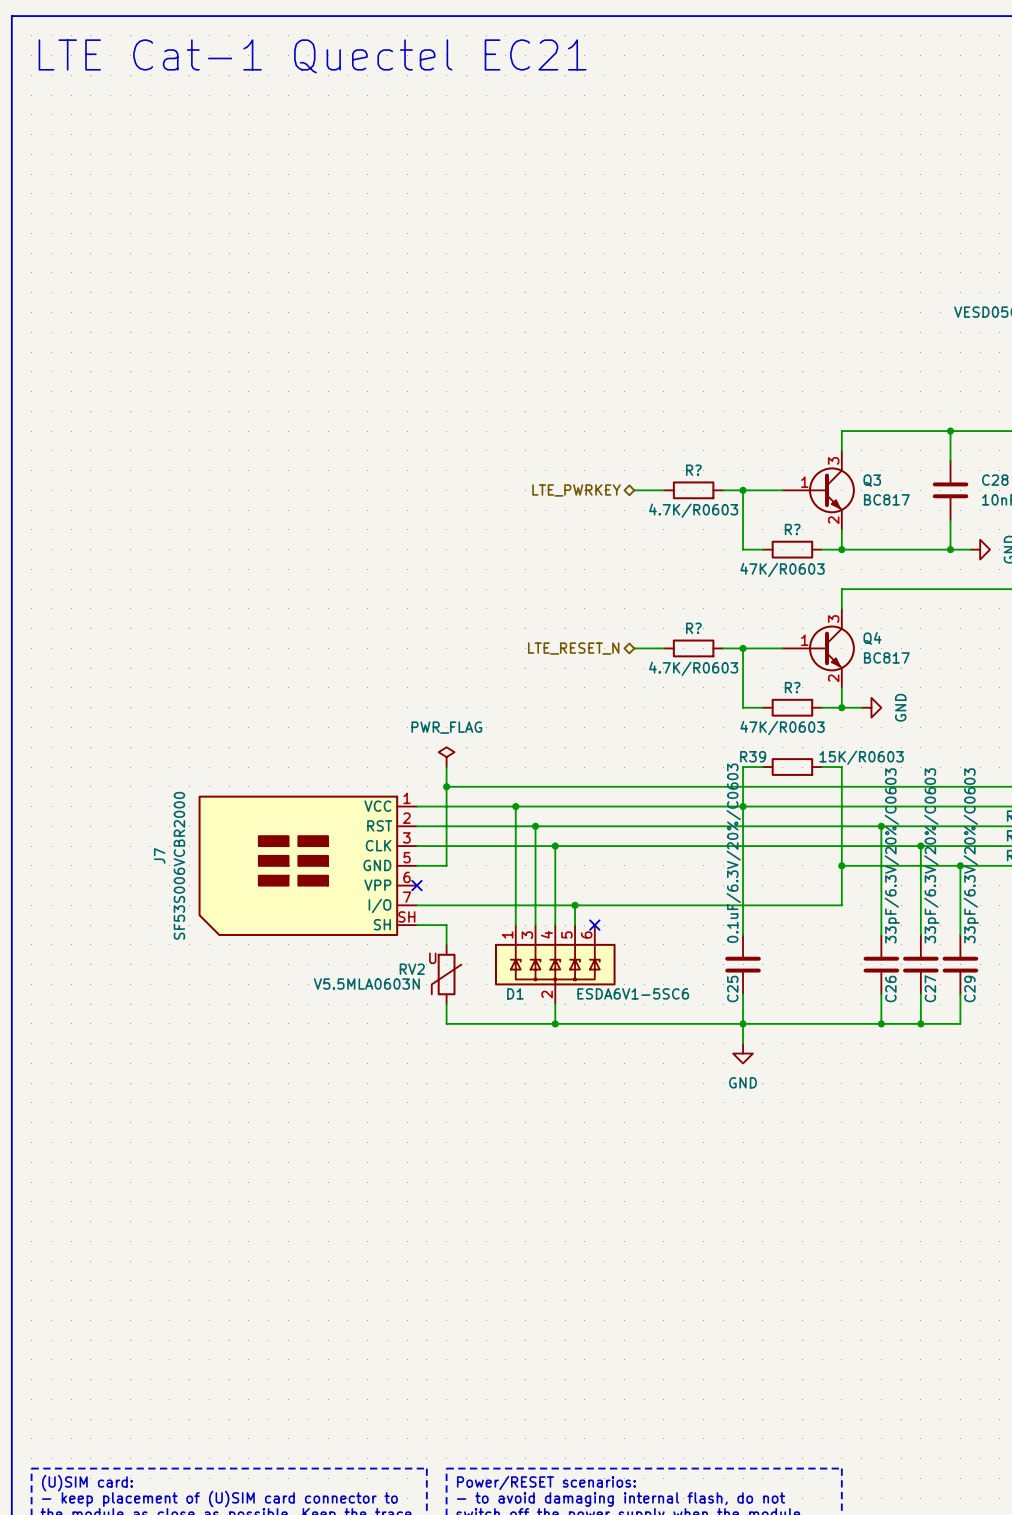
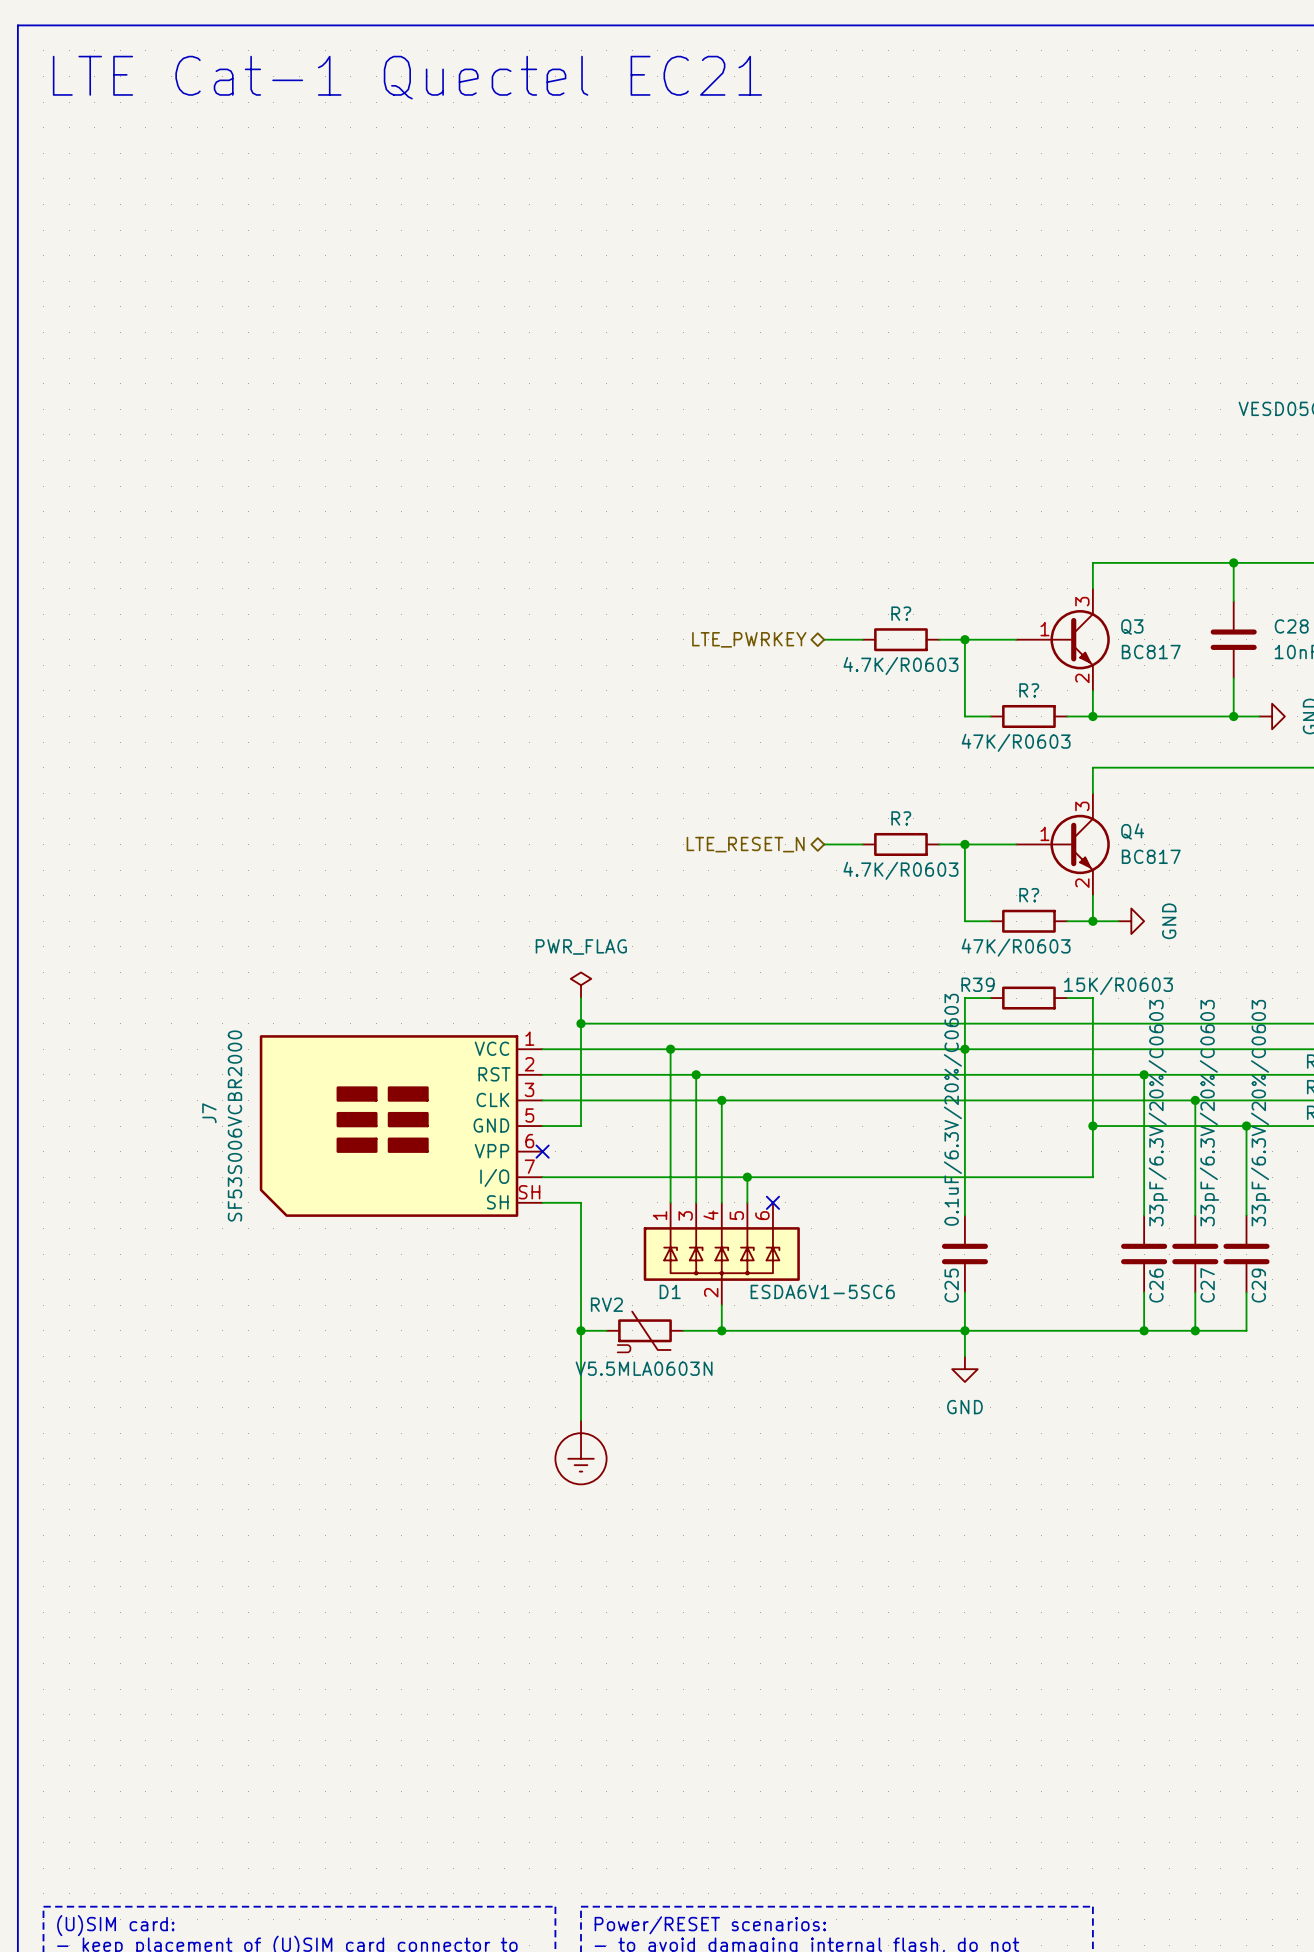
wire: none -> (581, 1228) (581, 1305)
RV2 name position: RV2 (412, 969) -> RV2 (606, 1304)
RV2 rotation: 0° (446, 974) -> 90° counterclockwise (644, 1330)
RV2 position: (446, 974) -> (644, 1330)
RV2 value position: V5.5MLA0603N (366, 984) -> V5.5MLA0603N (644, 1368)
wire: none -> (581, 1330) (581, 1420)
junction: none -> (581, 1330)
wire: (466, 1023) (525, 1023) -> none
power symbol: none -> (581, 1452)

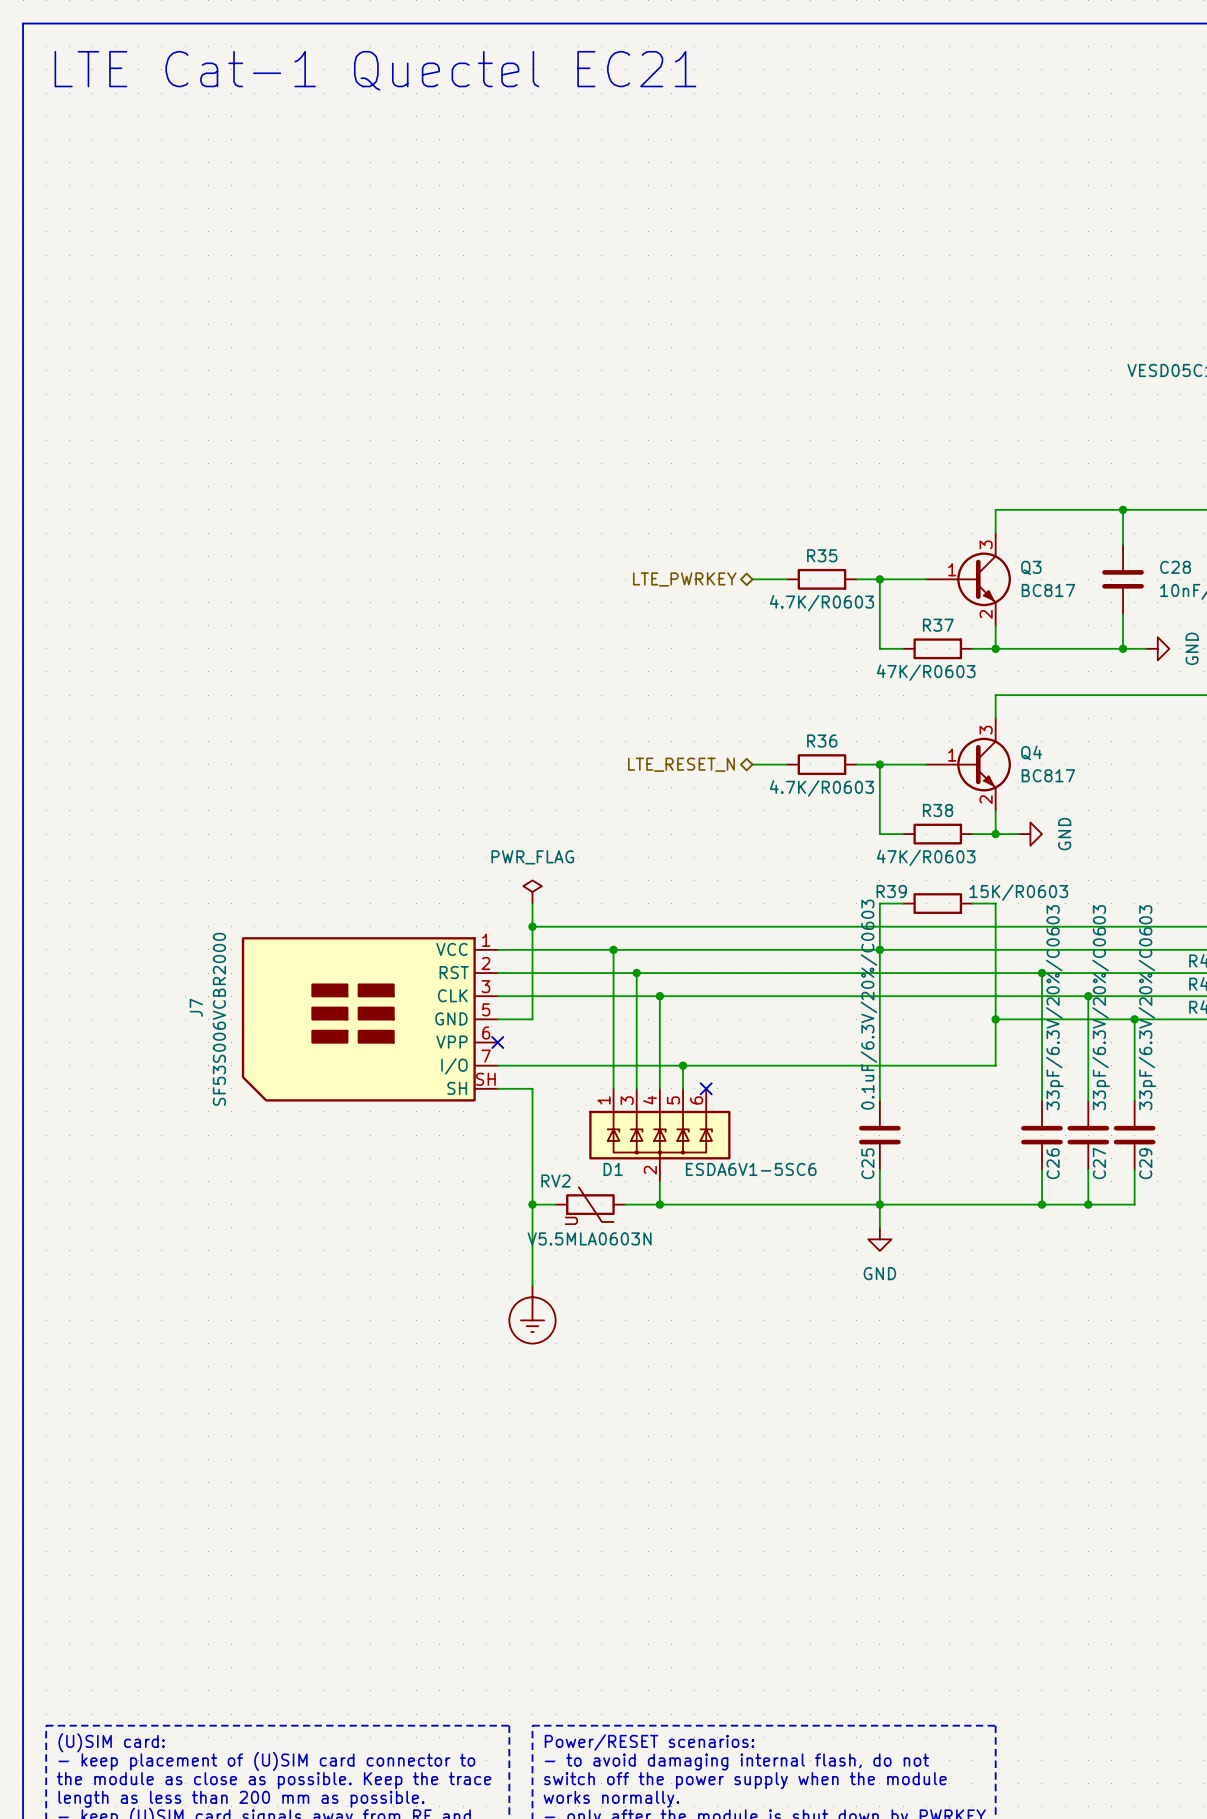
R? name: R? (901, 613) -> R35 (822, 555)
R? name: R? (1029, 690) -> R37 (938, 625)
R? name: R? (901, 818) -> R36 (822, 741)
R? name: R? (1029, 895) -> R38 (938, 810)

